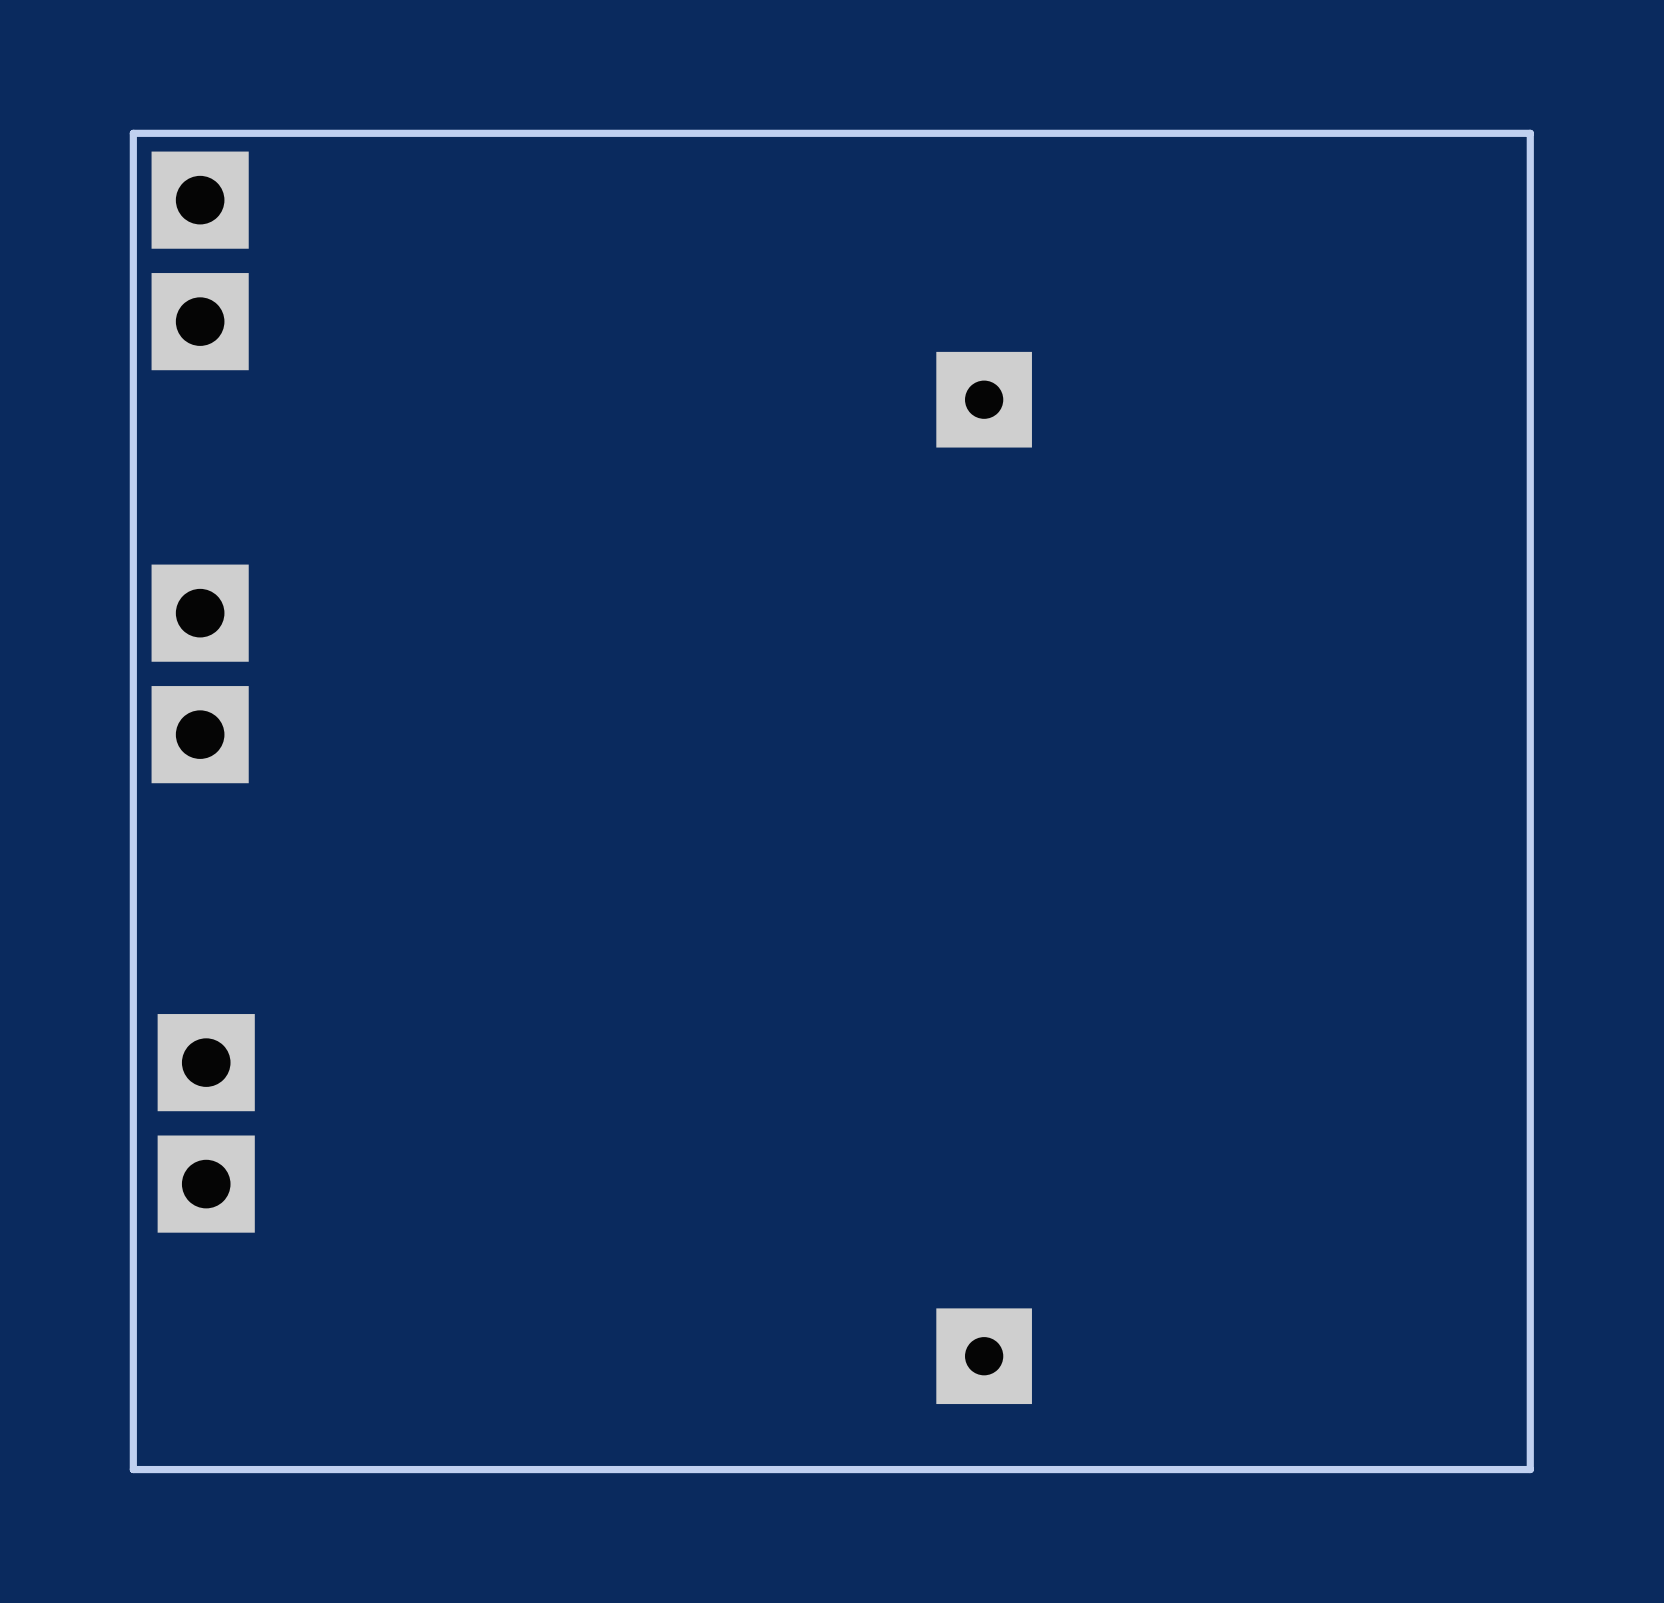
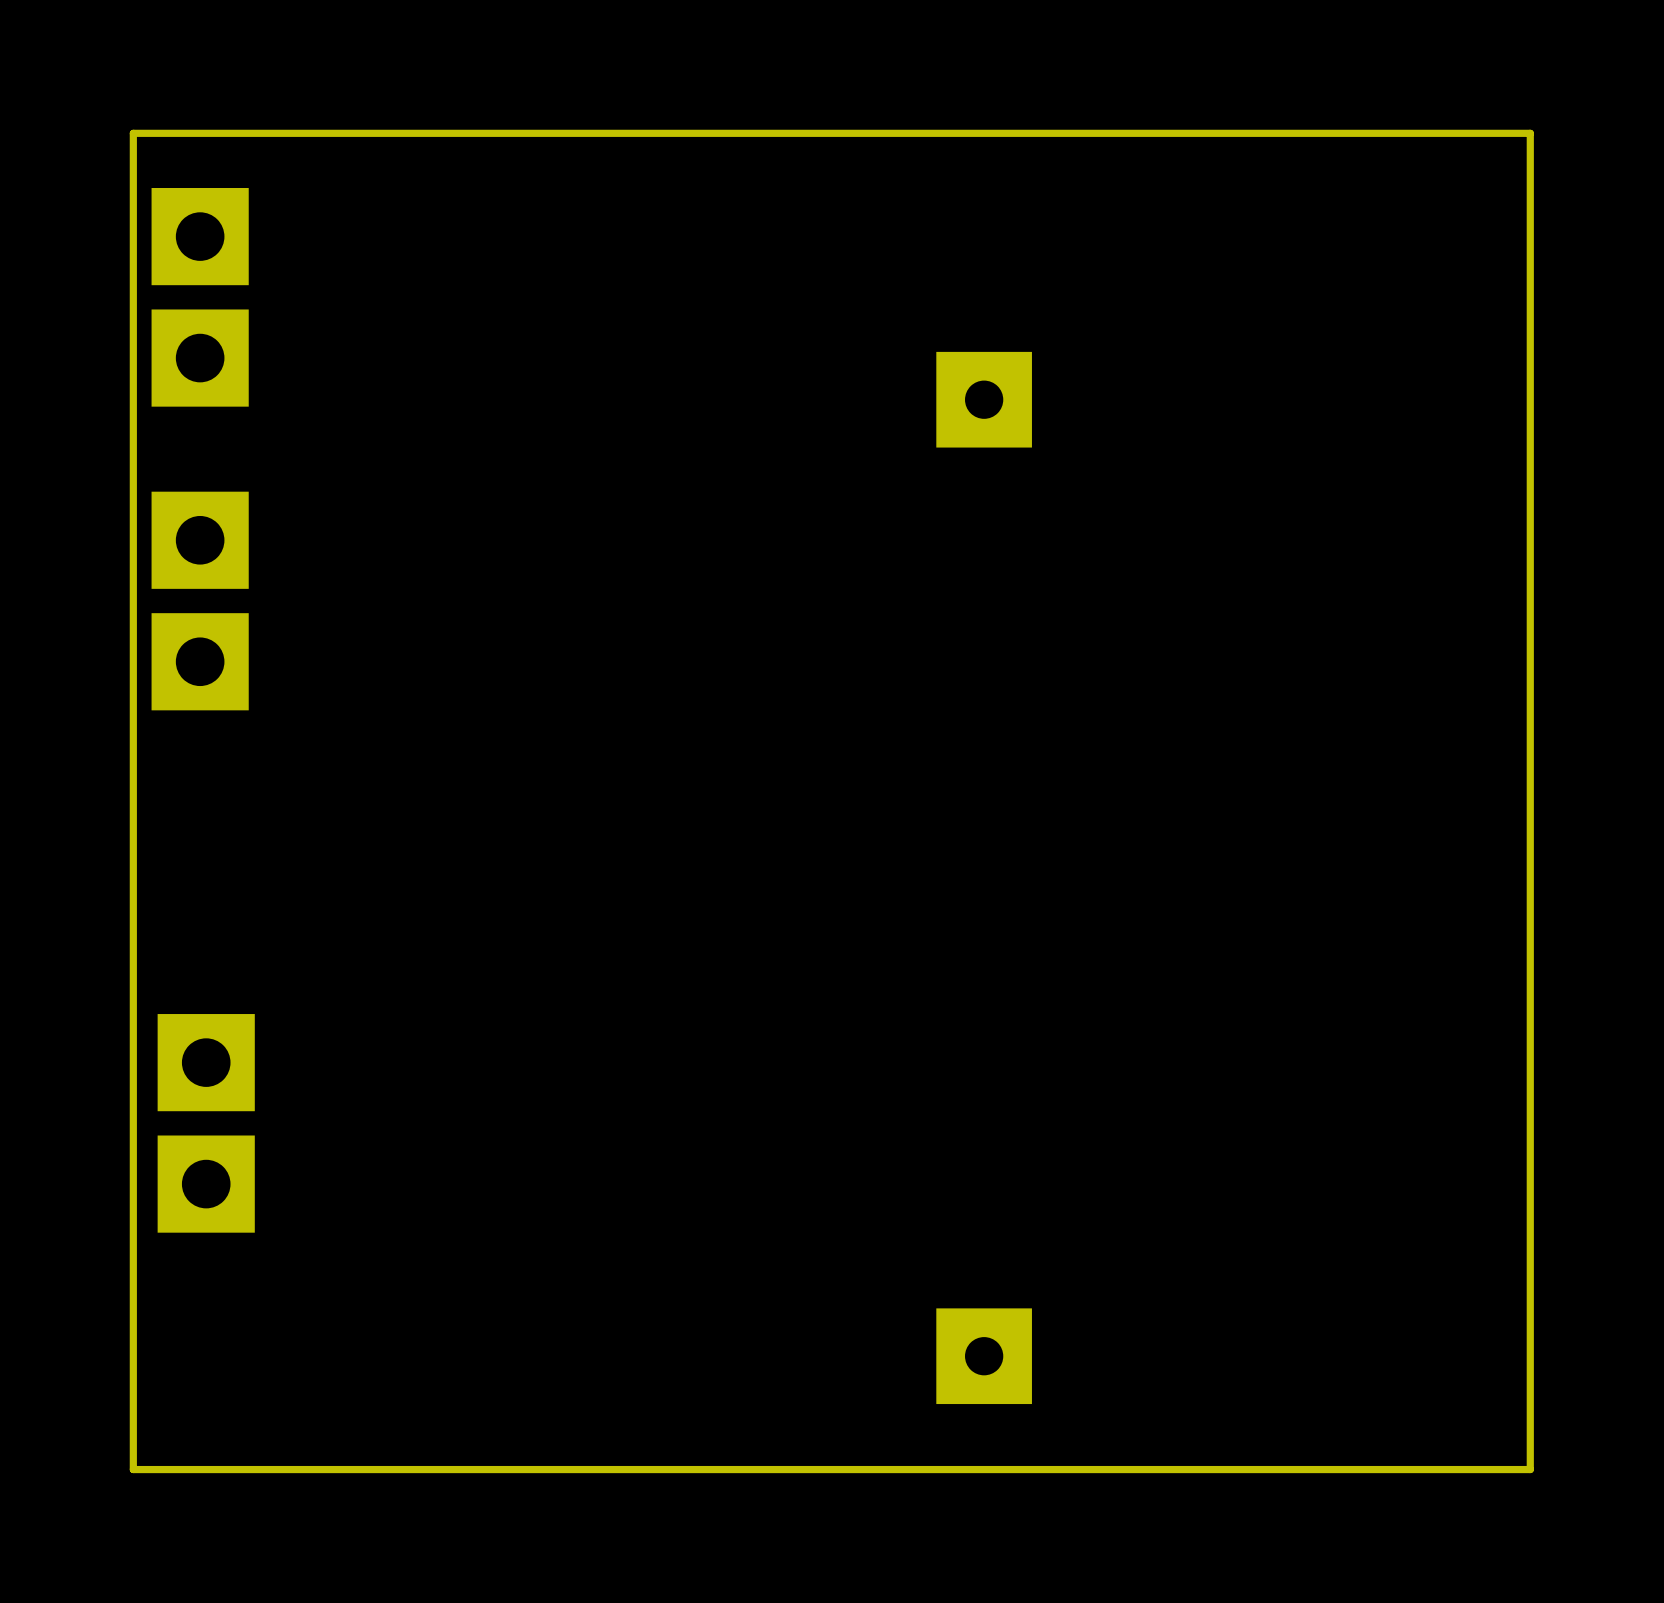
part position: (200, 260) -> (200, 297)
part position: (200, 673) -> (200, 601)

